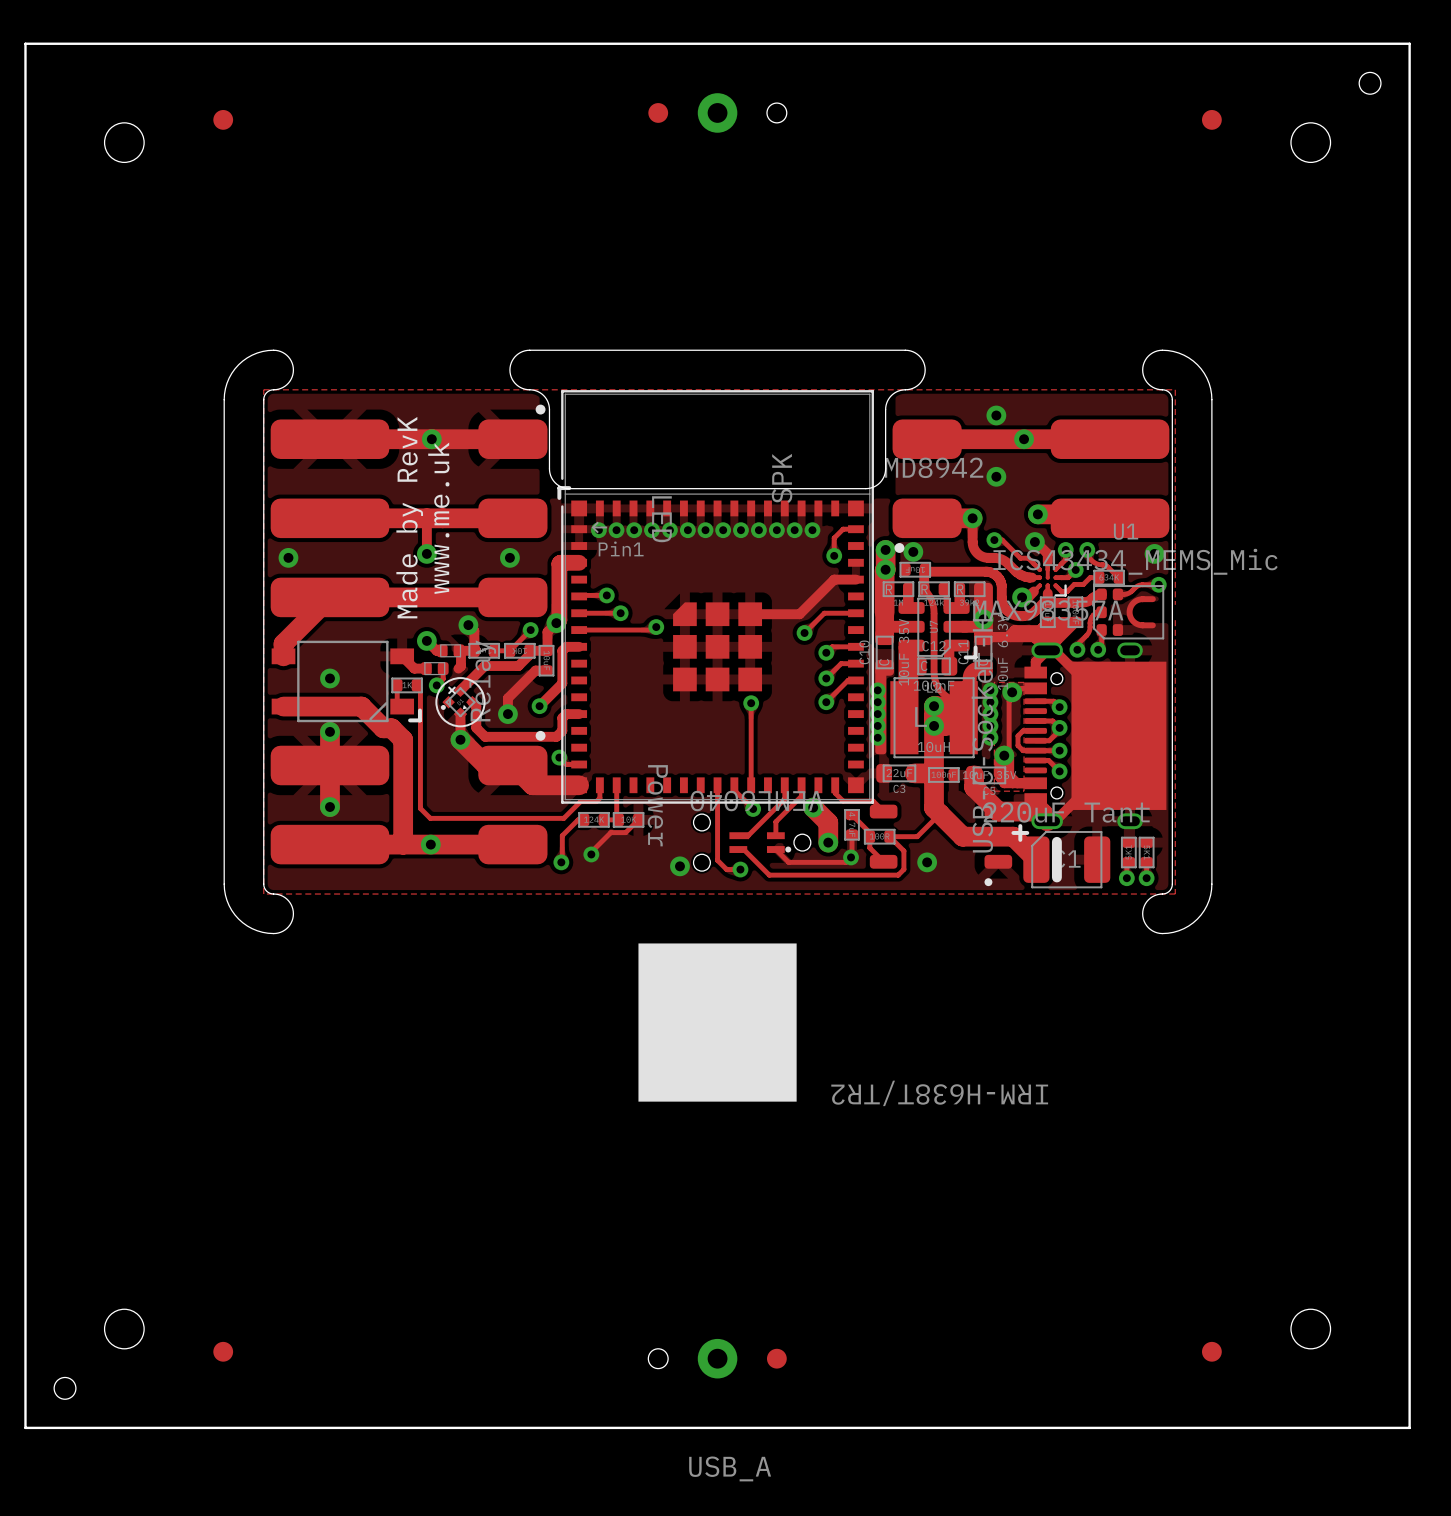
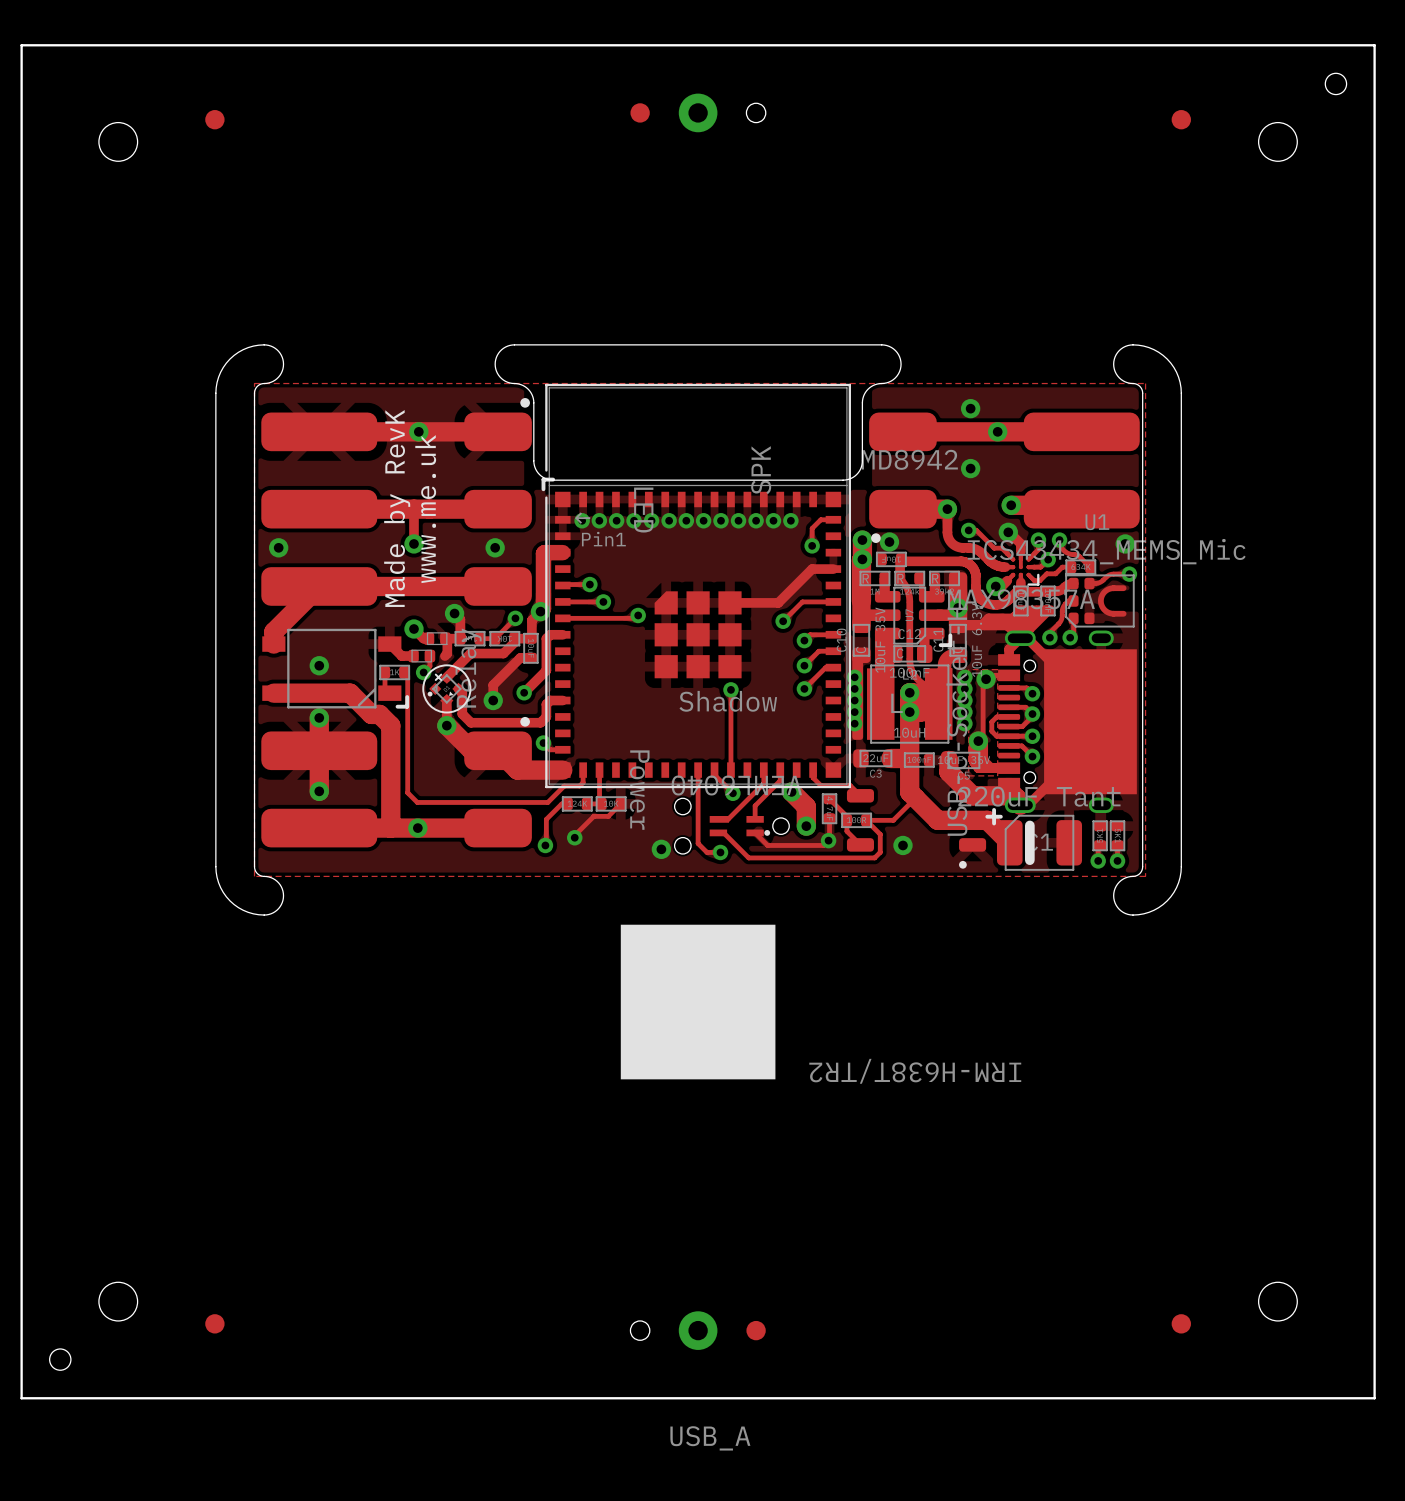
drawing: none -> [679, 690, 778, 712]

